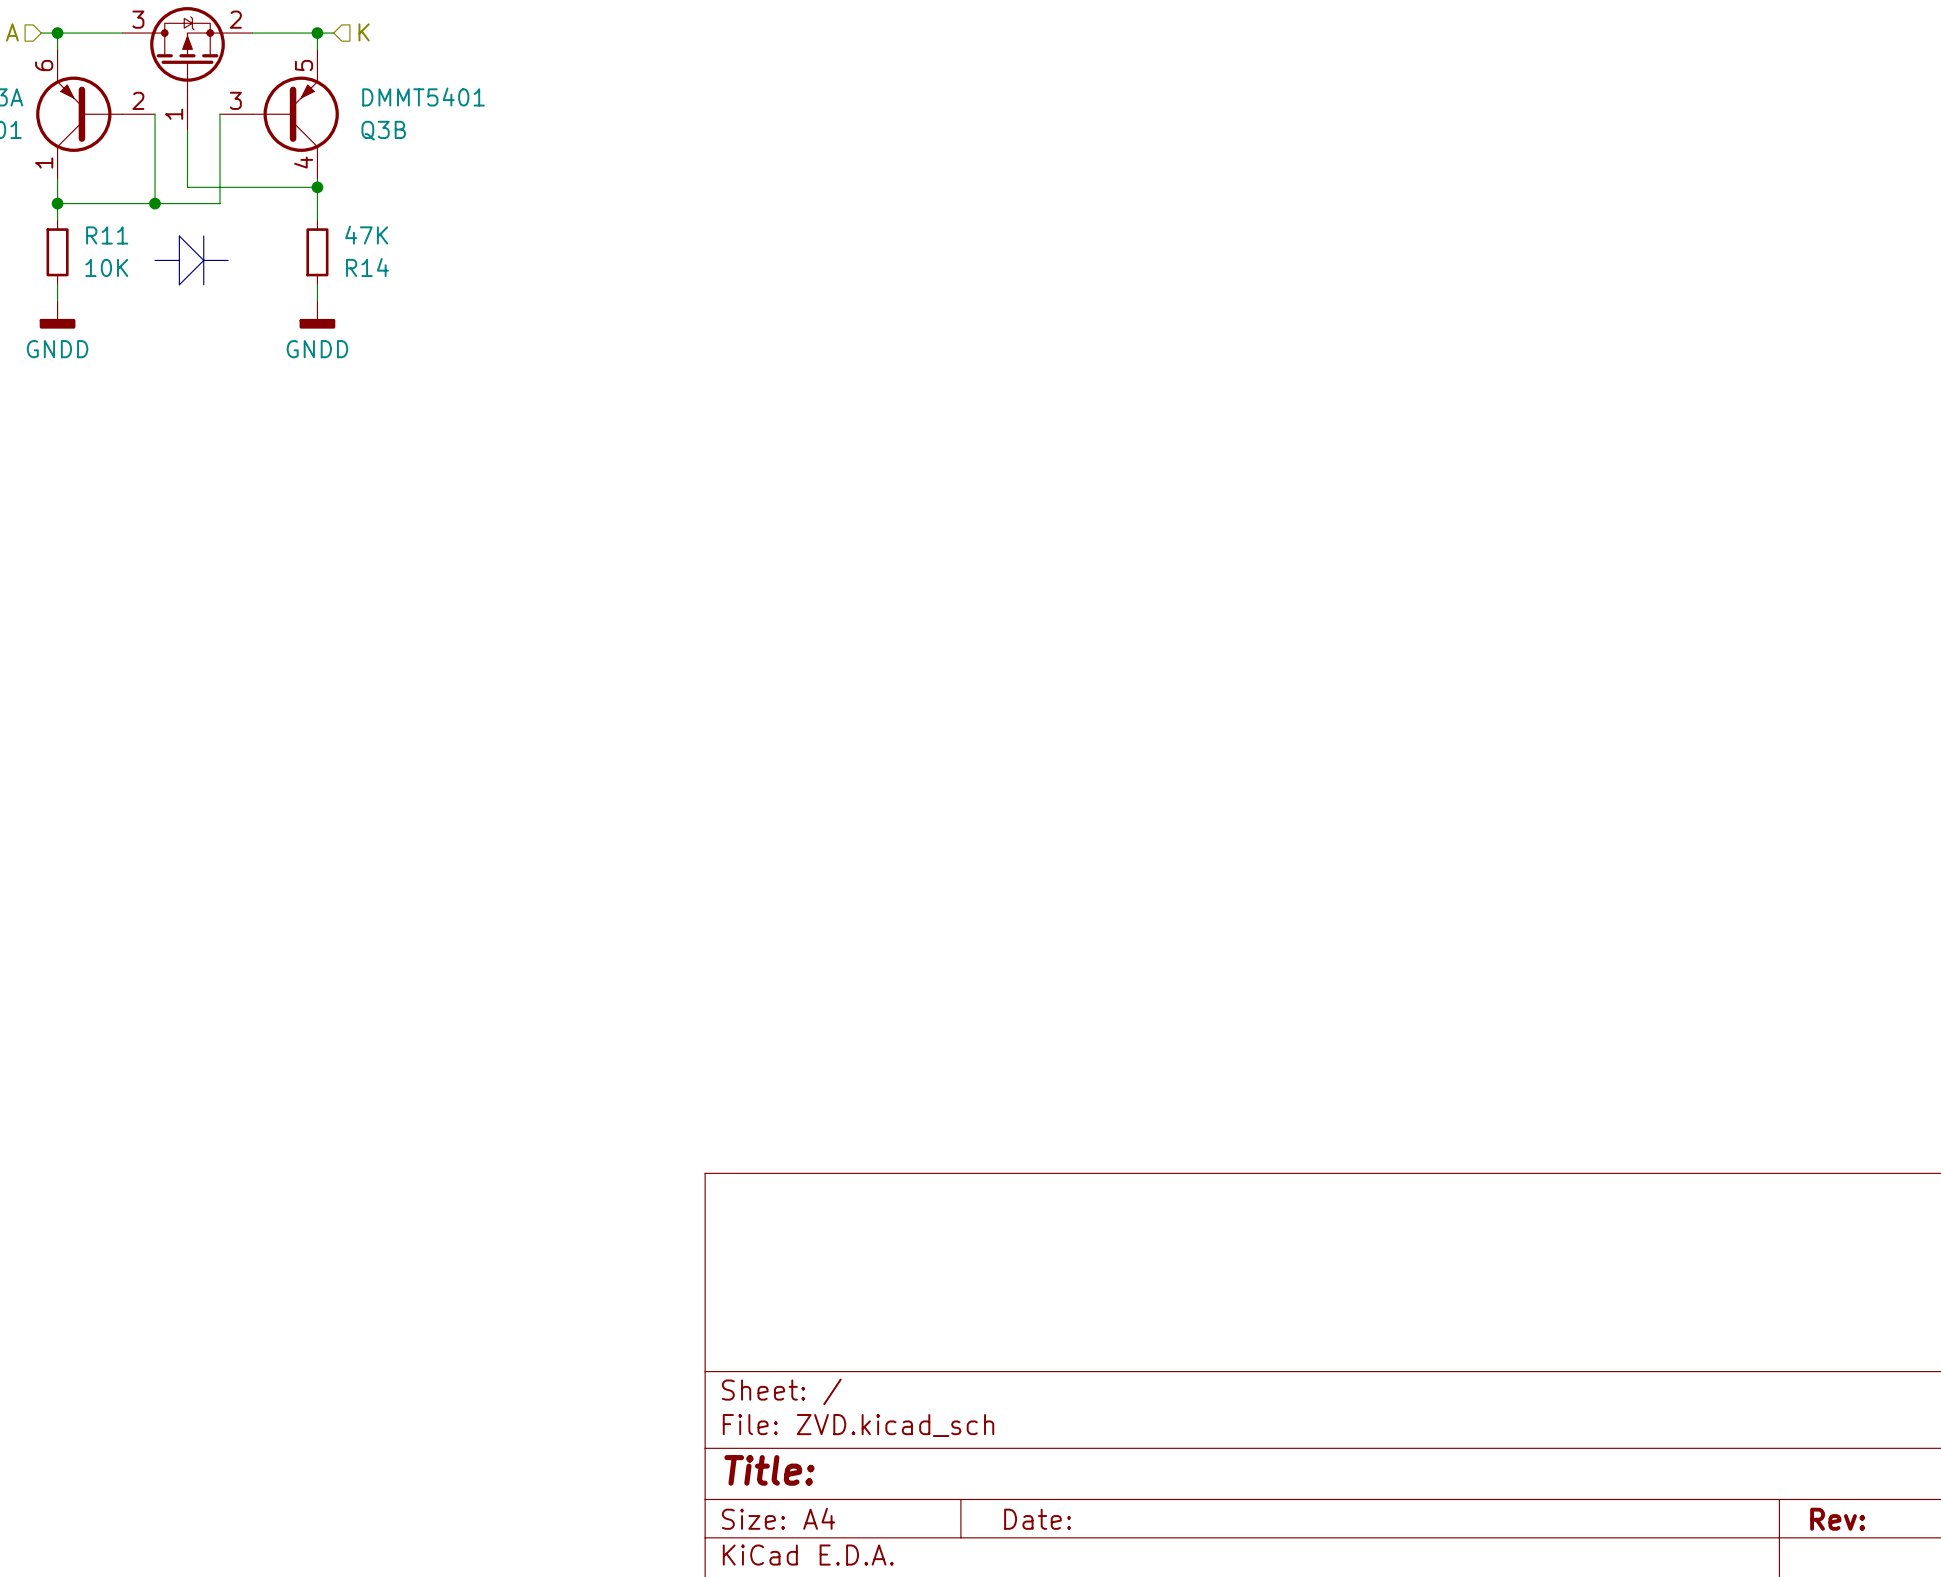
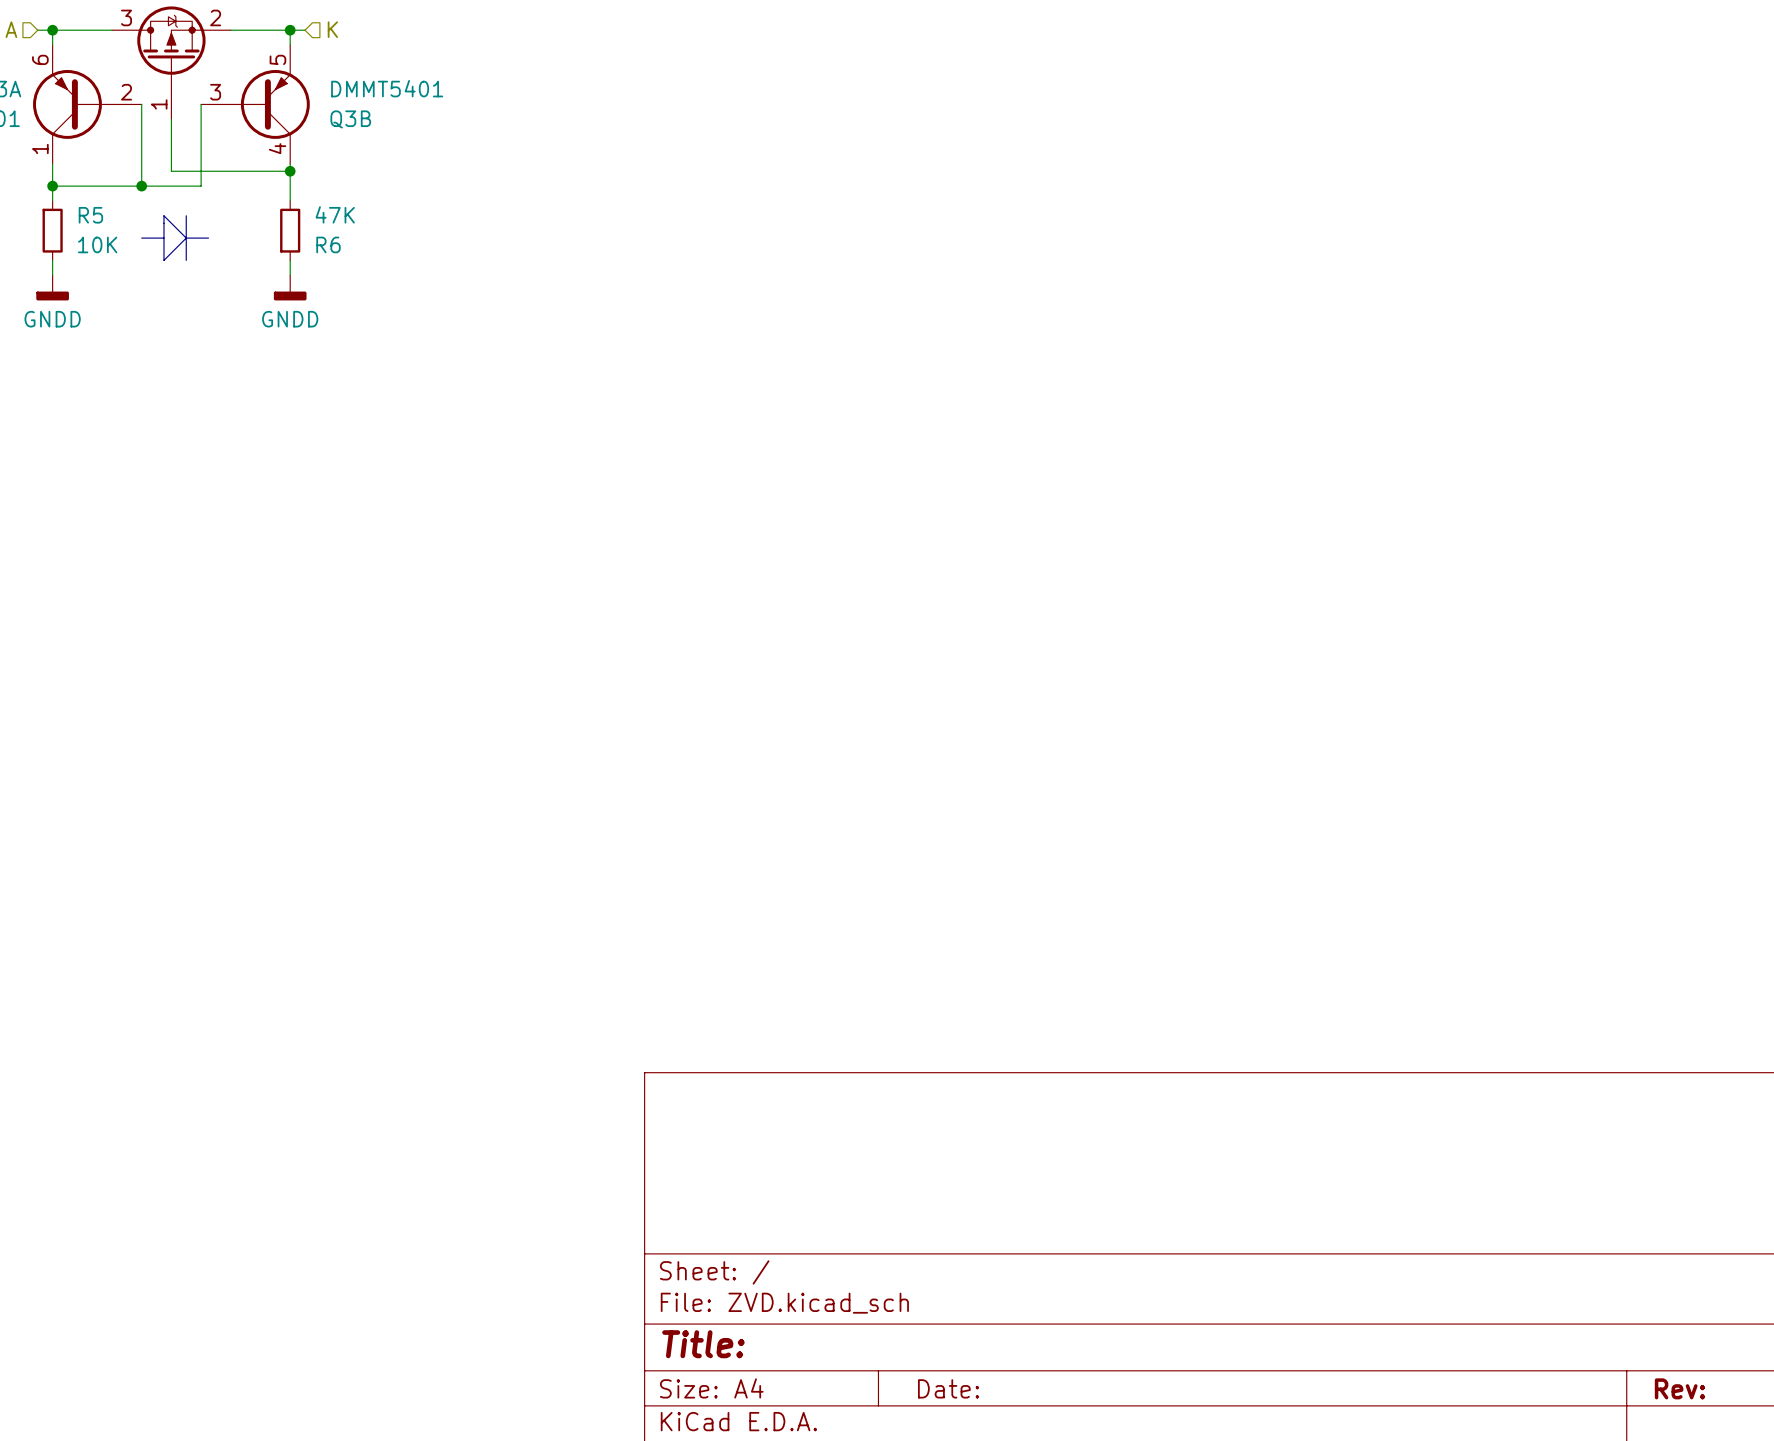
R11 name: R11 (107, 235) -> R5 (90, 215)
R14 name: R14 (367, 267) -> R6 (328, 244)

